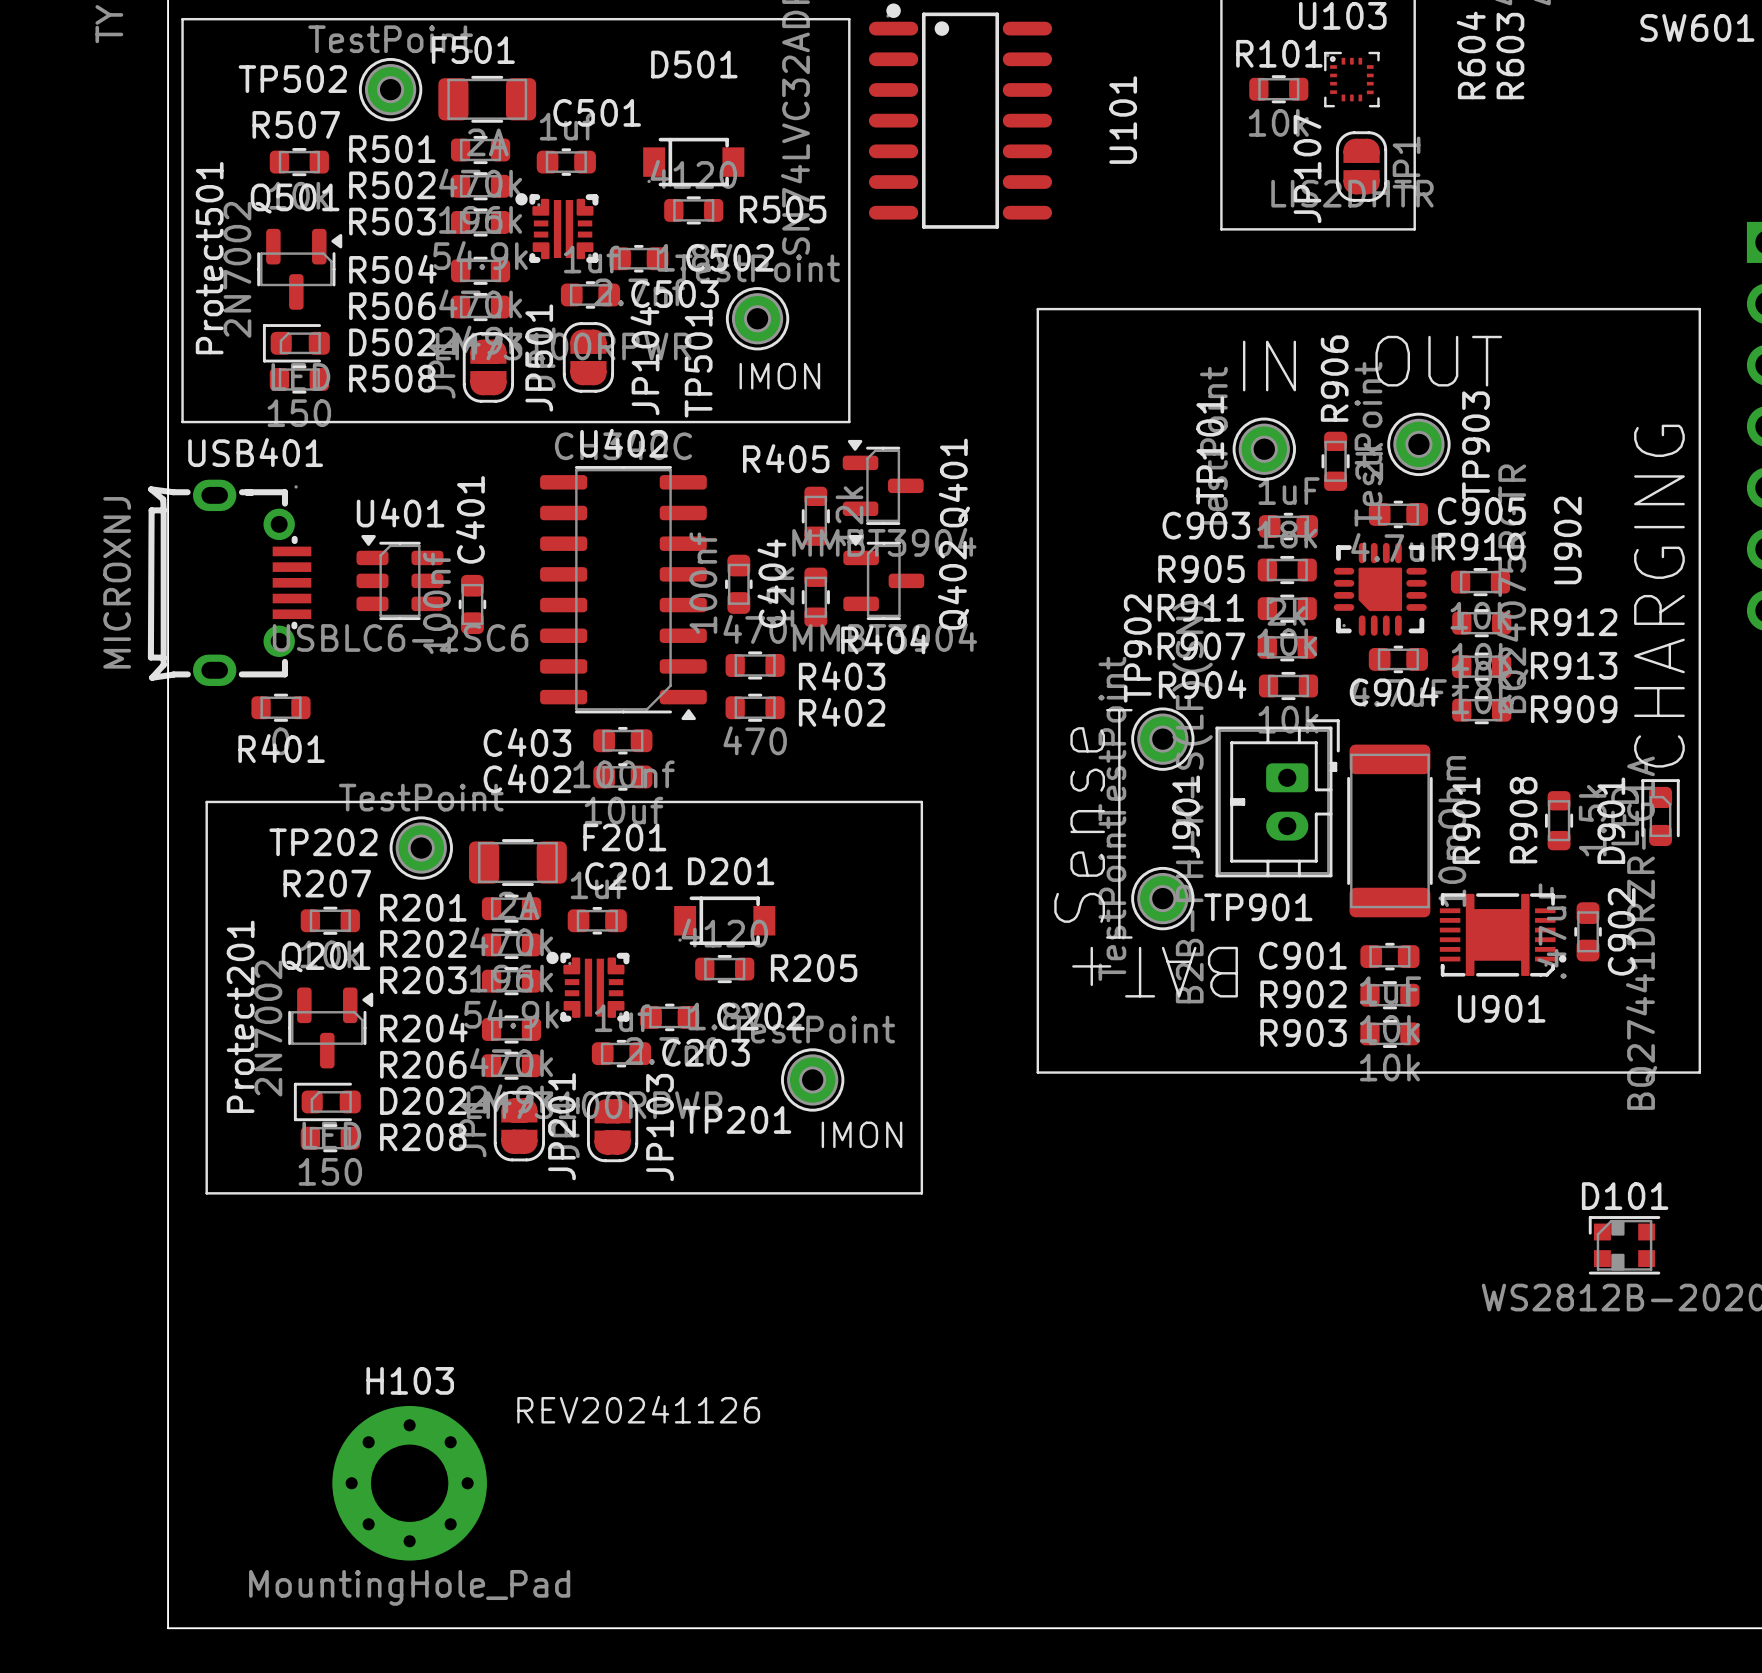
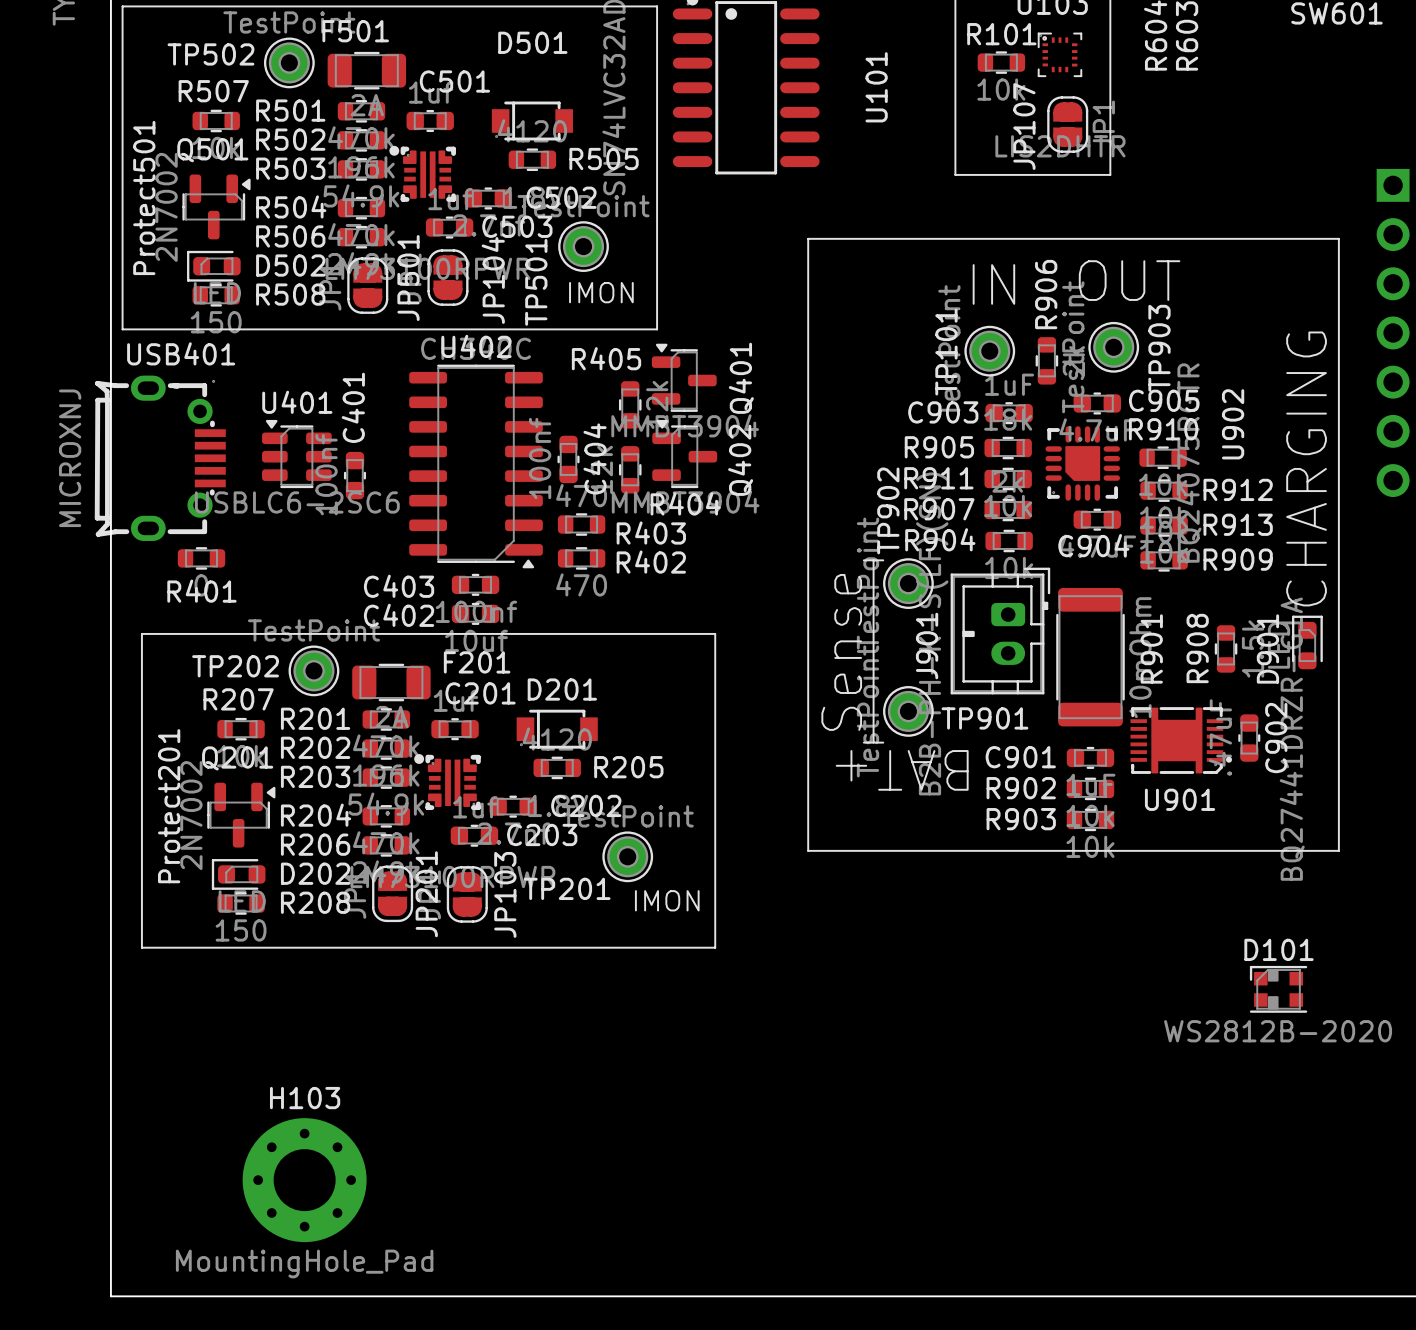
text: REV20241126 (638, 1409) -> none

